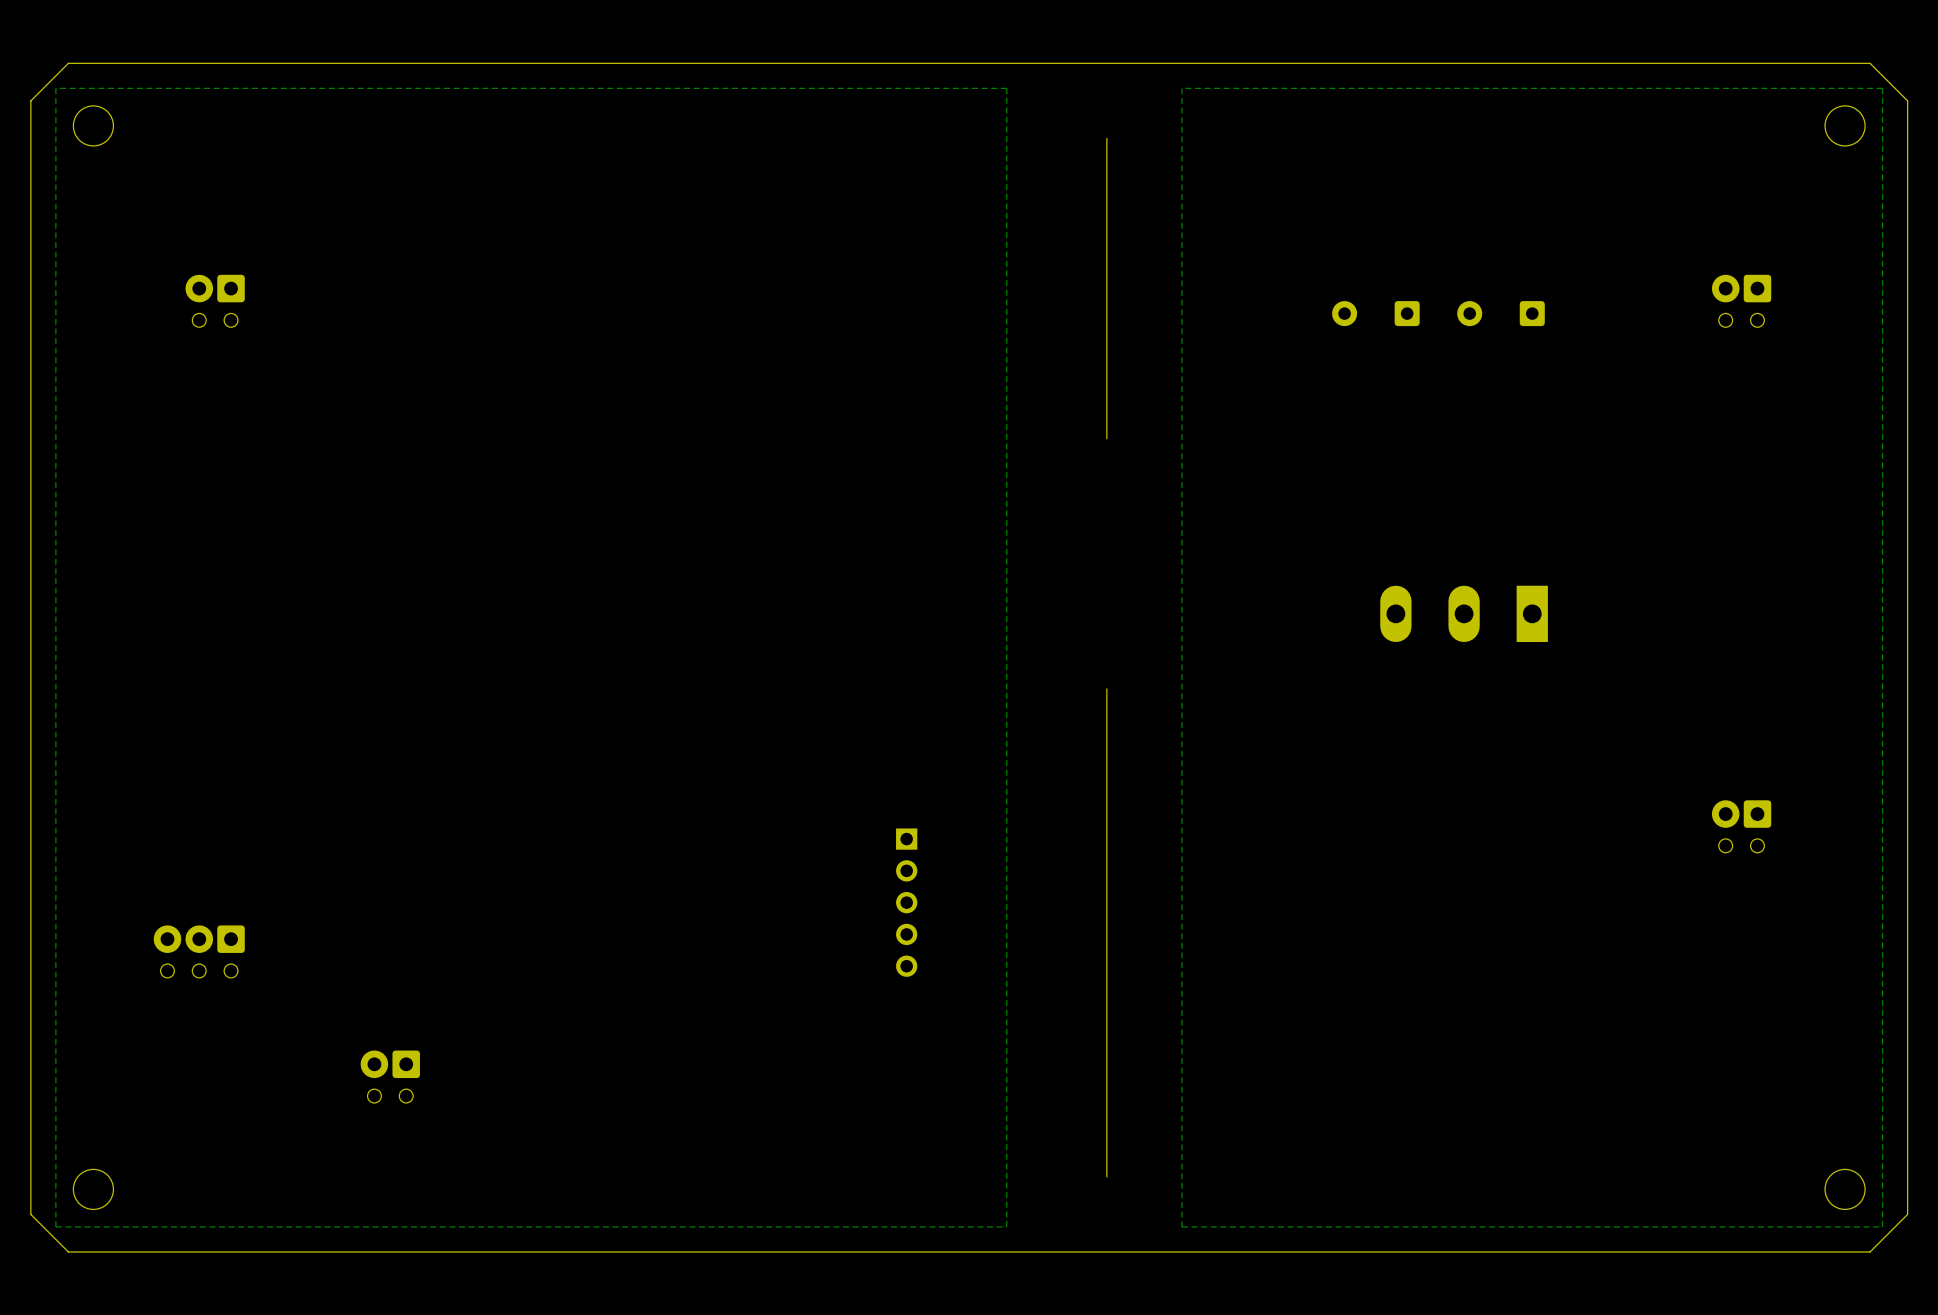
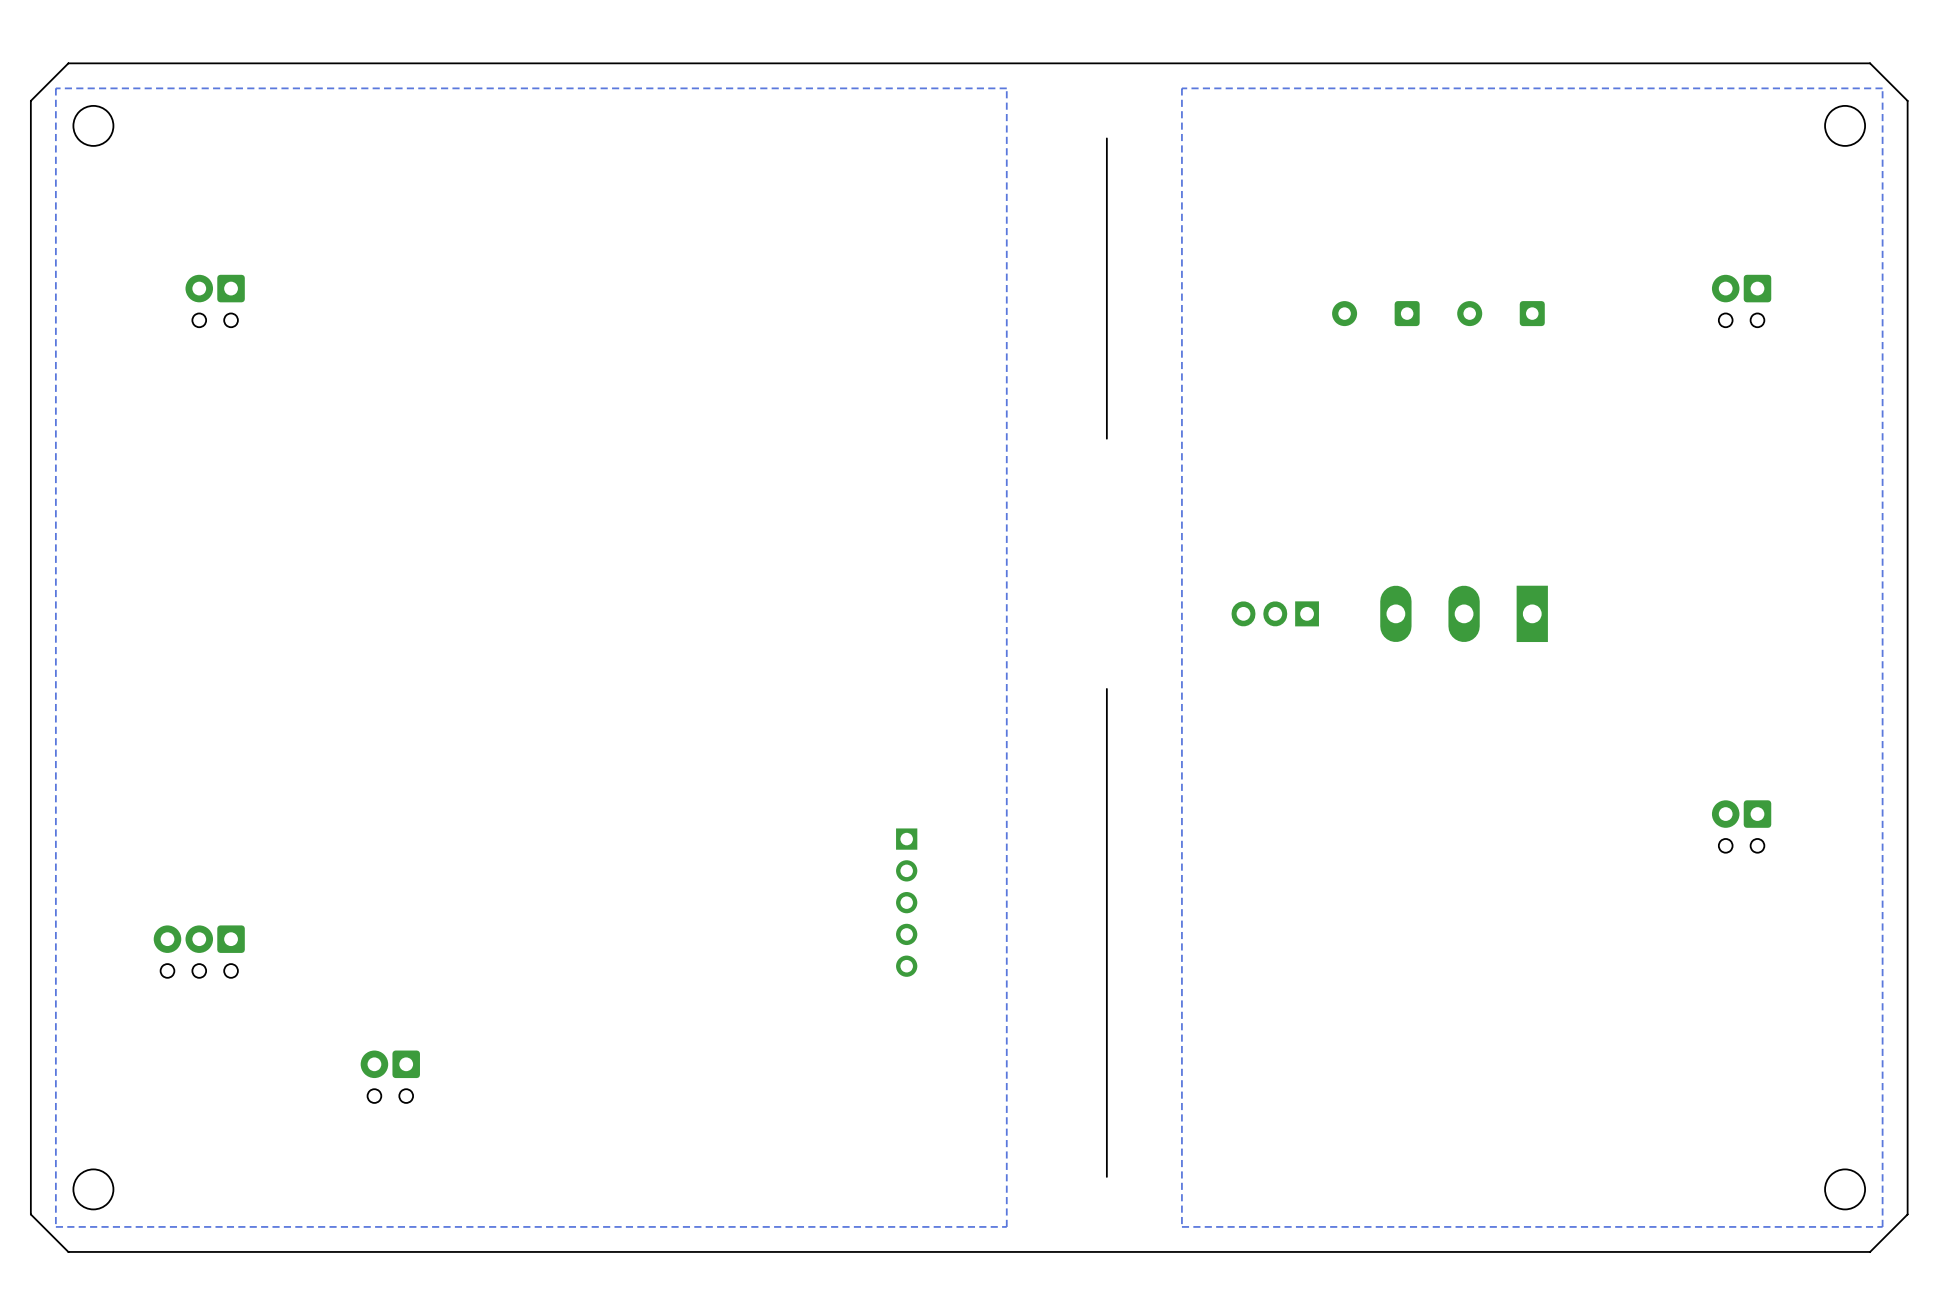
part: none -> (1275, 613)

